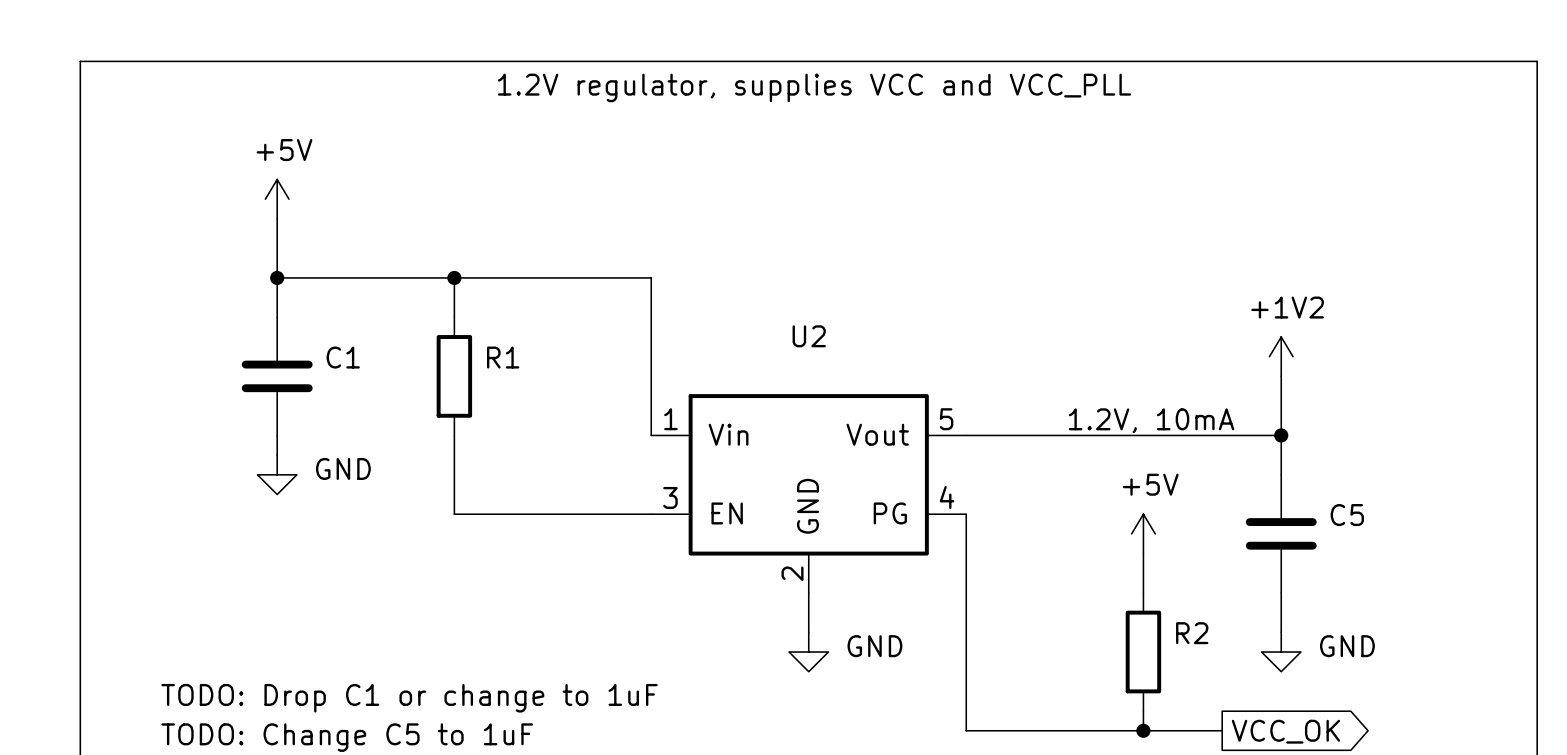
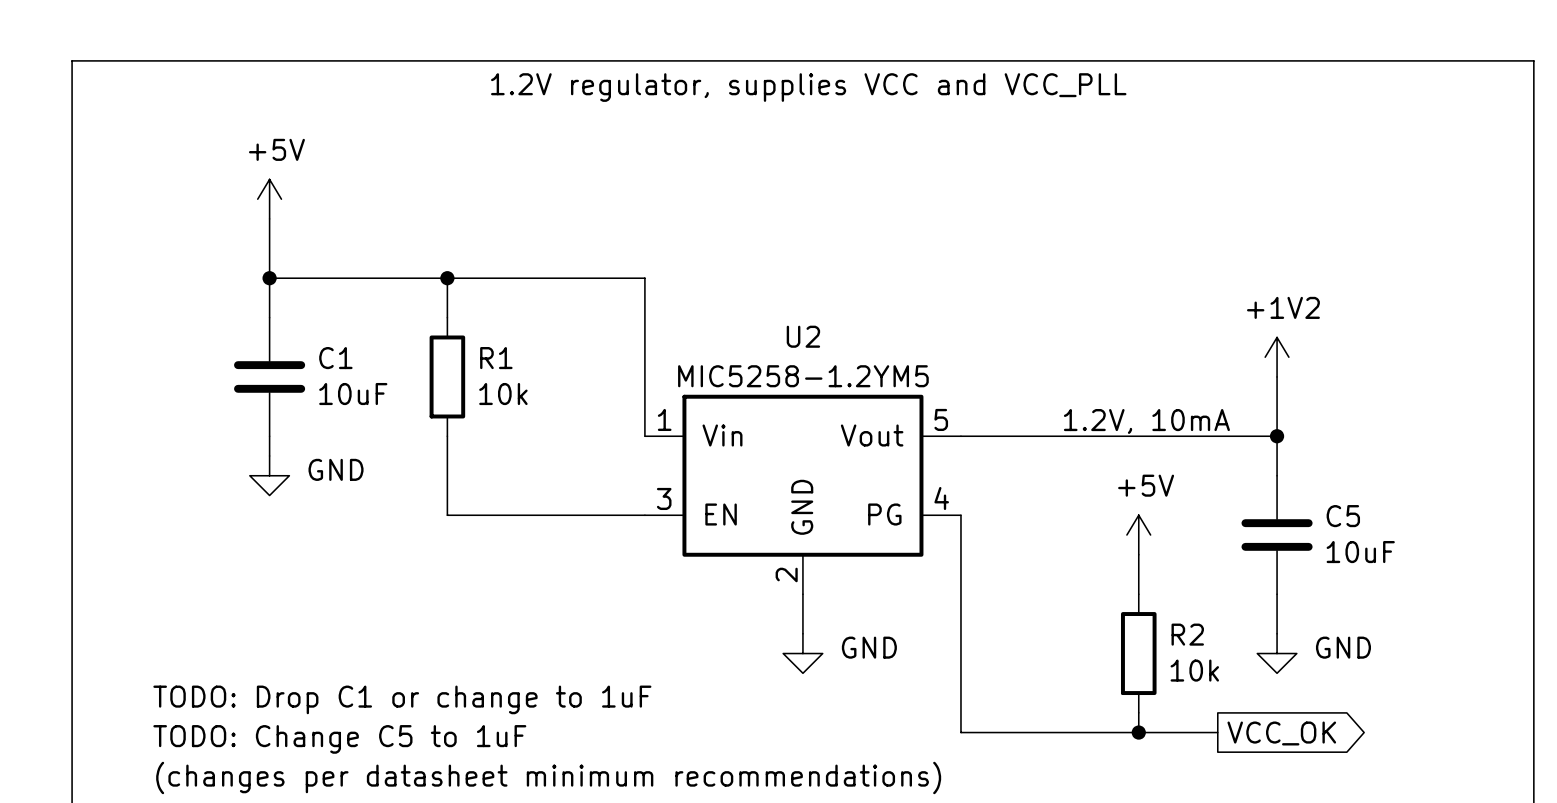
U2 value: none -> MIC5258-1.2YM5 (803, 376)
C1 value: none -> 10uF (353, 394)
R1 value: none -> 10k (503, 394)
C5 value: none -> 10uF (1360, 552)
R2 value: none -> 10k (1194, 670)

